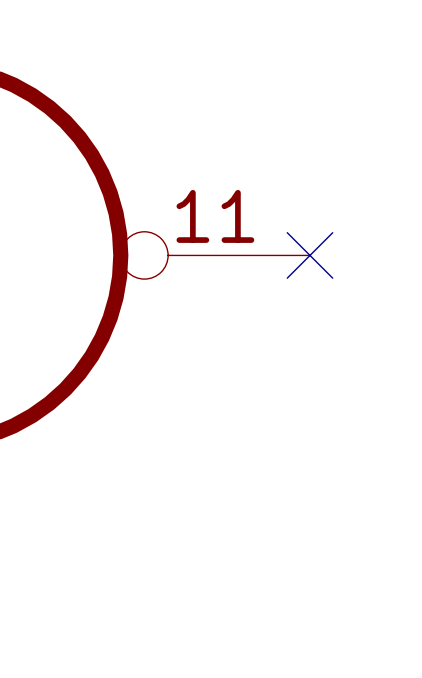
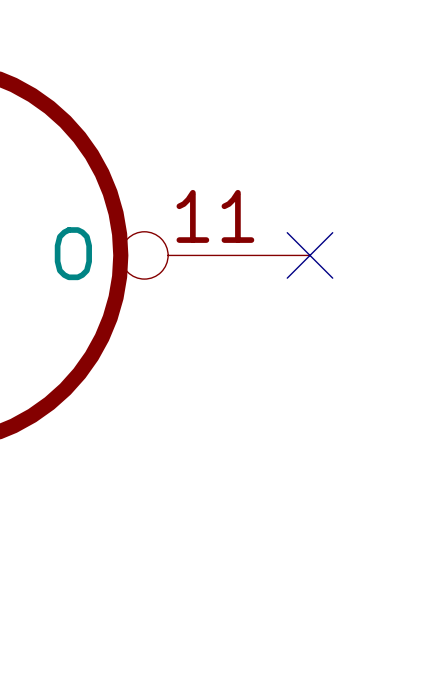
part pin name: none -> O (73, 253)

